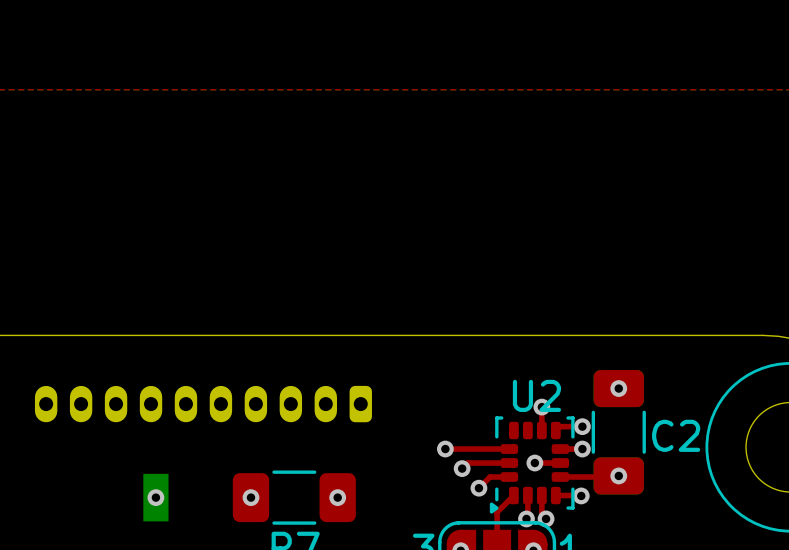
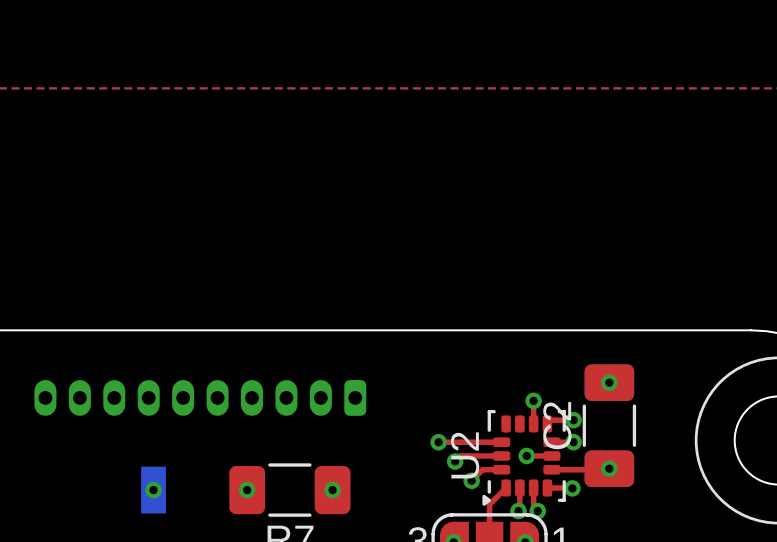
U2 name rotation: 0° (536, 395) -> 90° counterclockwise (465, 455)
U2 name position: U2 (536, 395) -> U2 (465, 455)
C2 name rotation: 0° (676, 435) -> 90° counterclockwise (557, 425)
C2 name position: C2 (676, 435) -> C2 (557, 425)

